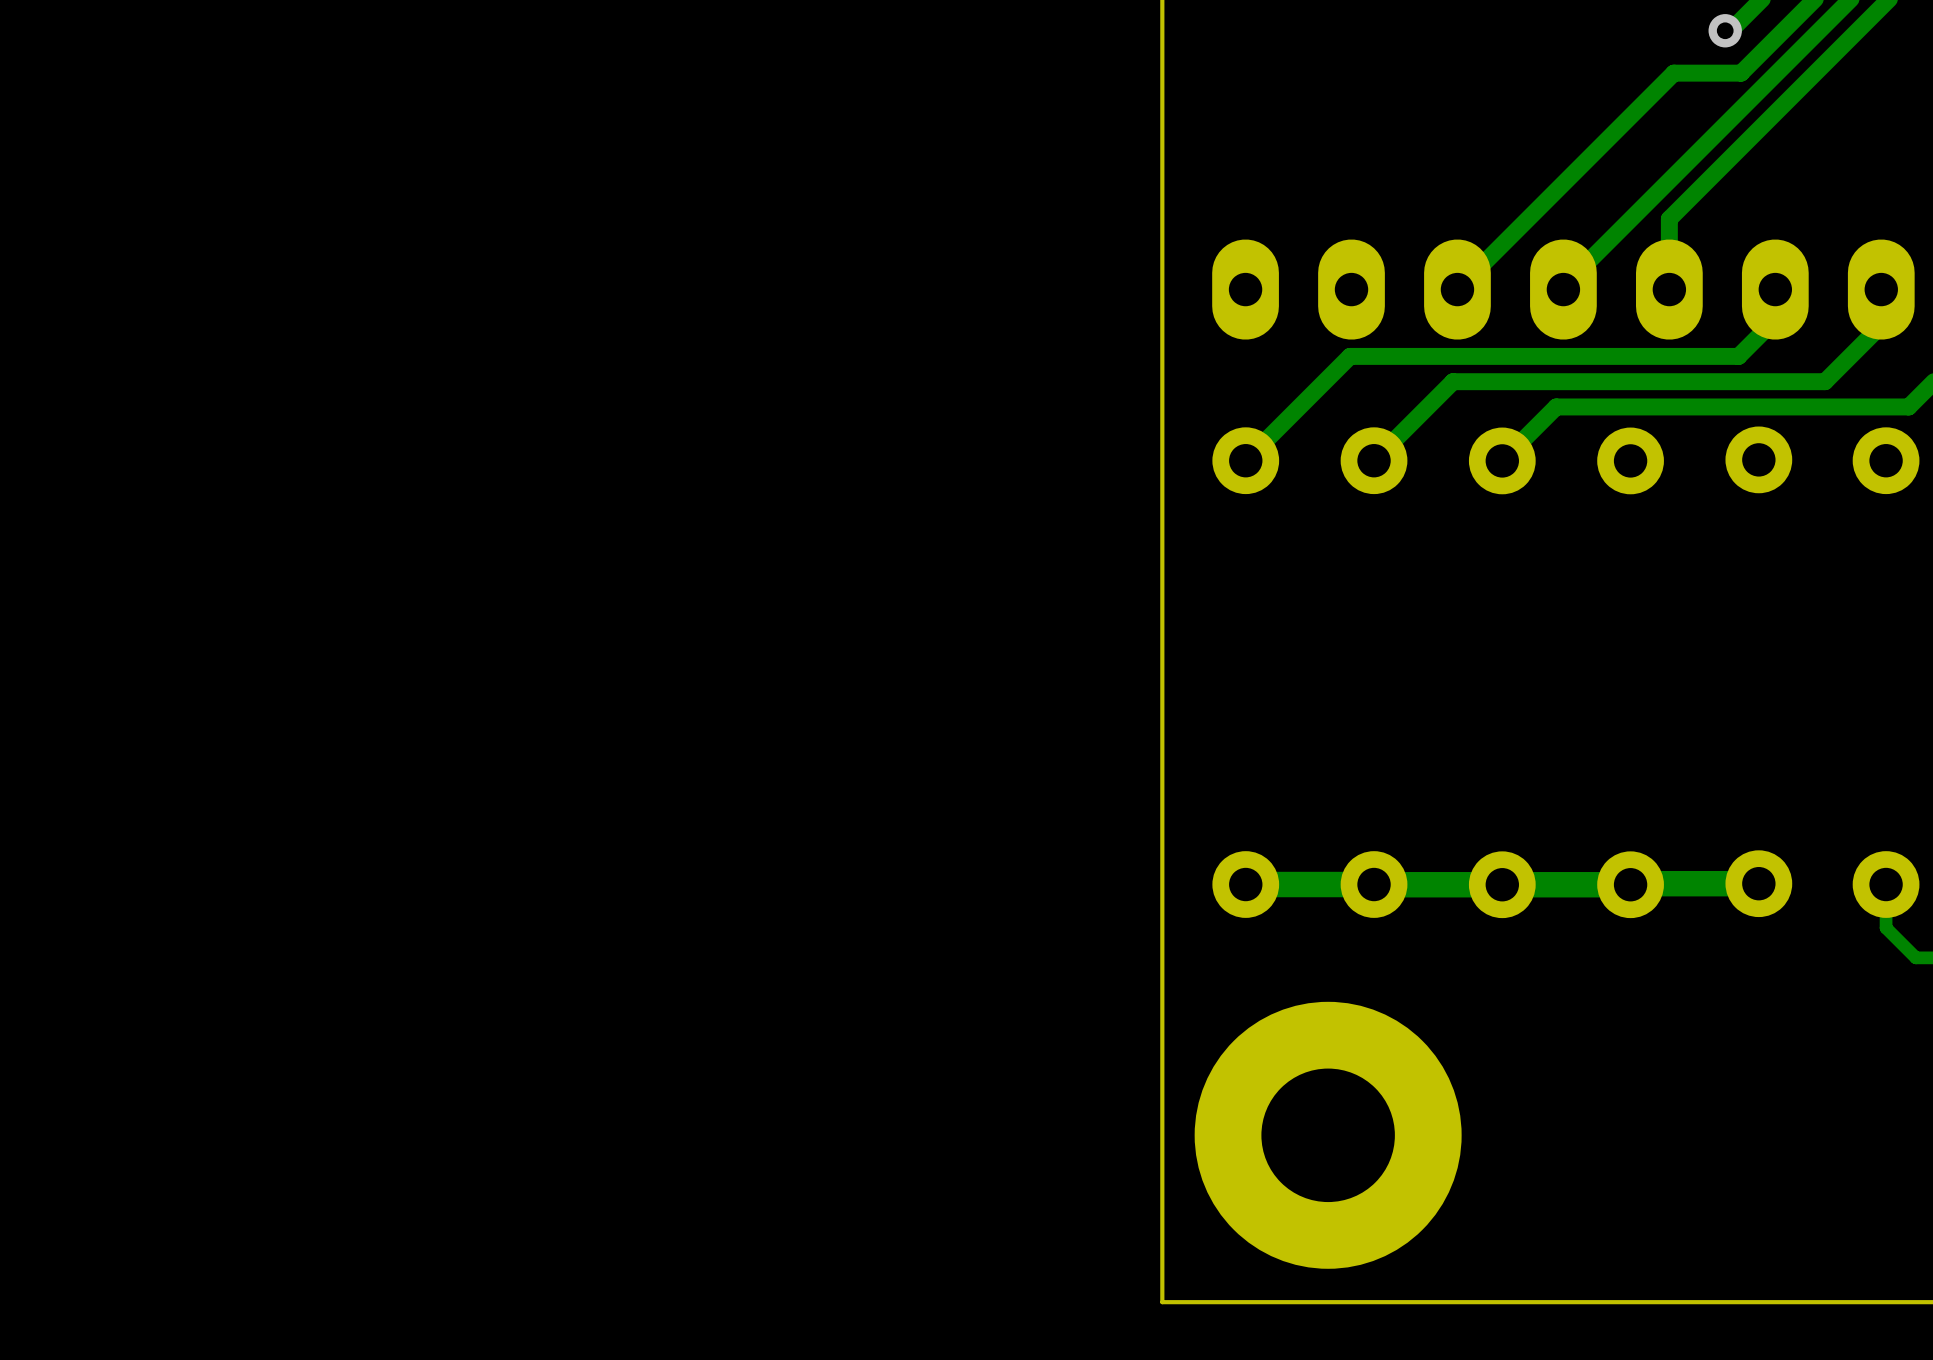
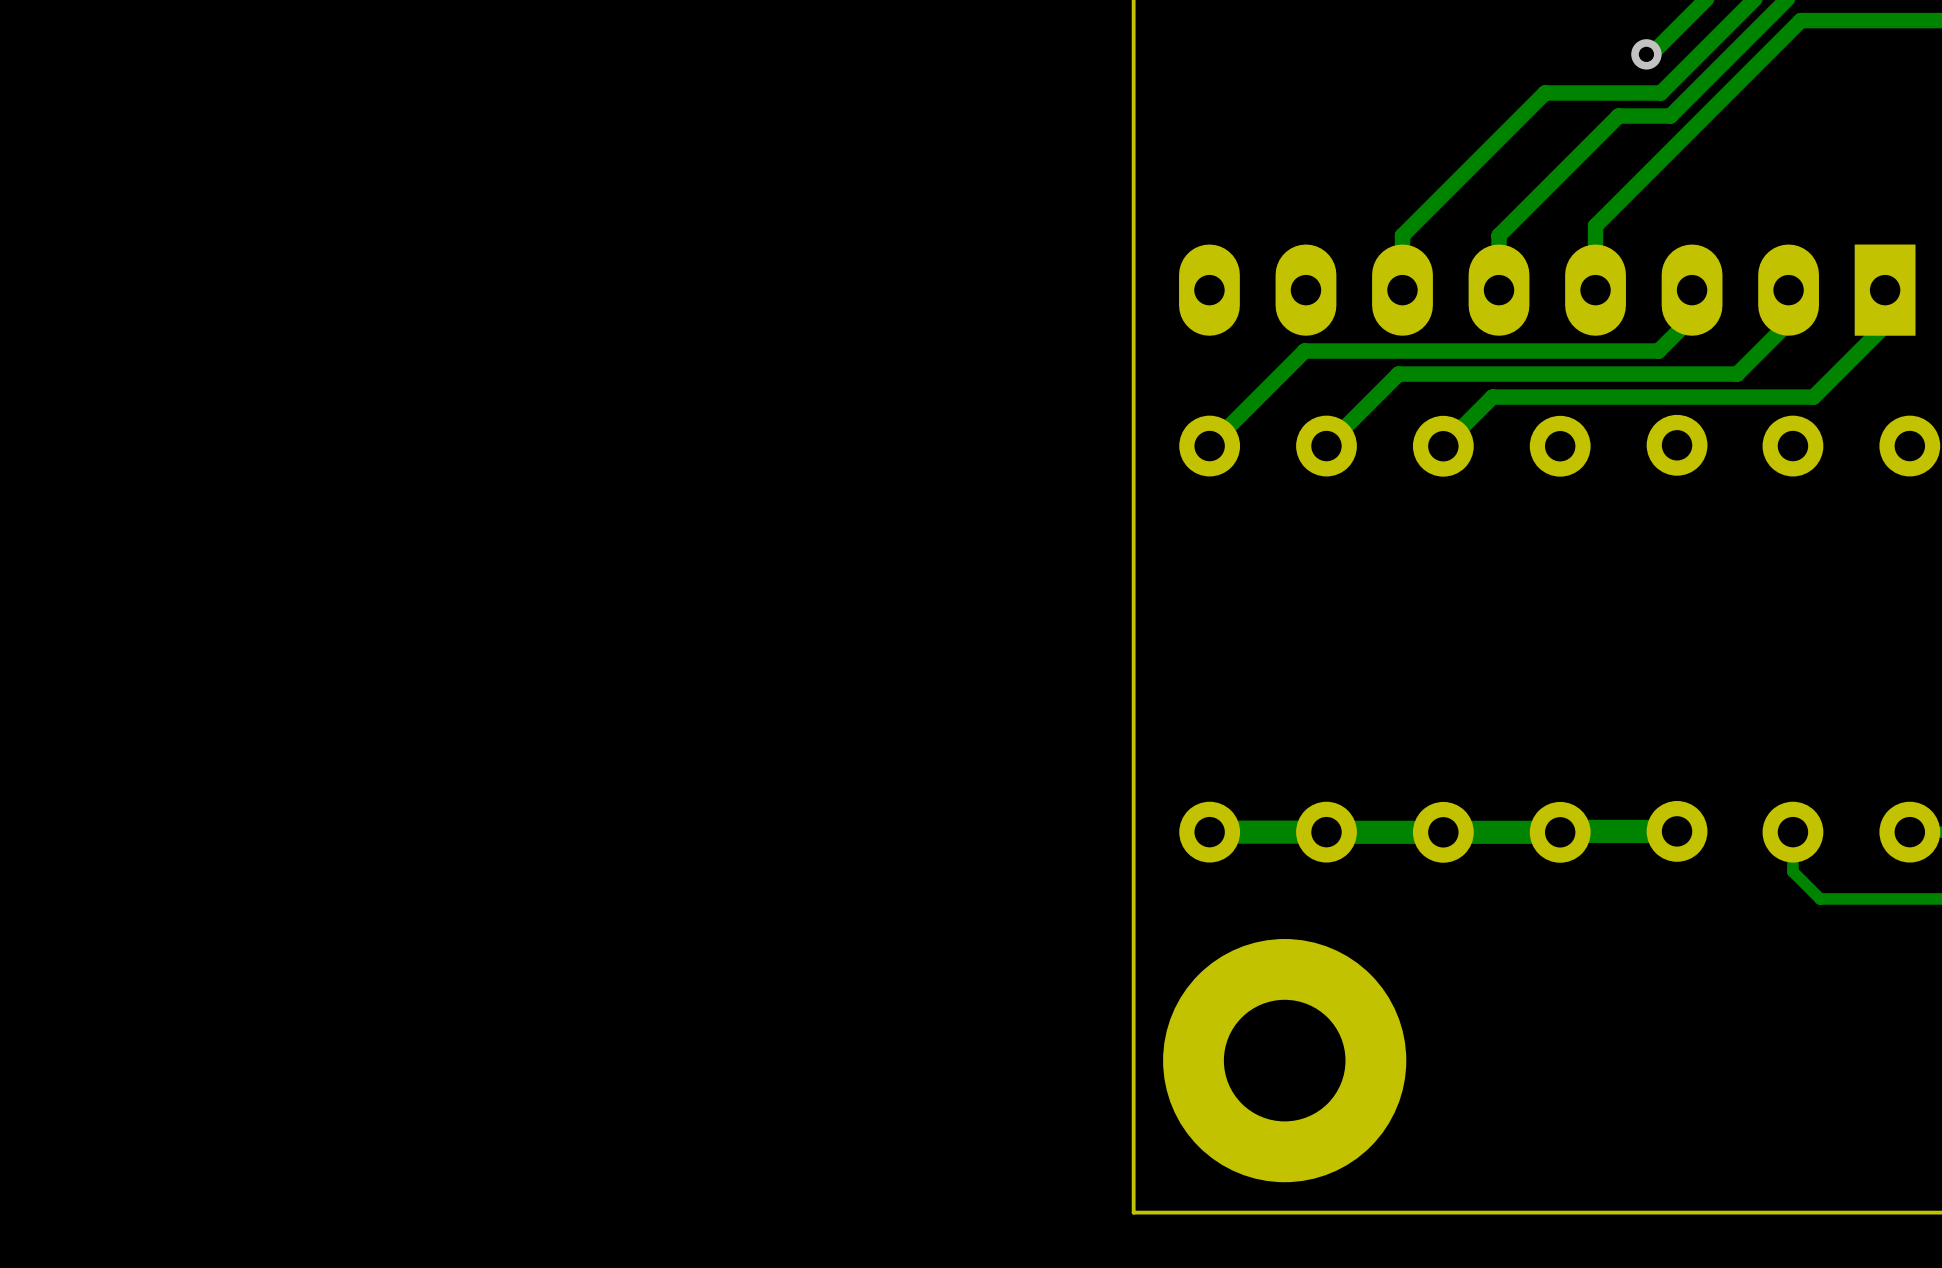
track: (1673, 73) (1457, 289) -> (1599, 92) (1545, 92) (1402, 235) (1402, 290)
track: (1751, 98) (1563, 286) -> (1670, 116) (1618, 116) (1499, 235) (1499, 287)

